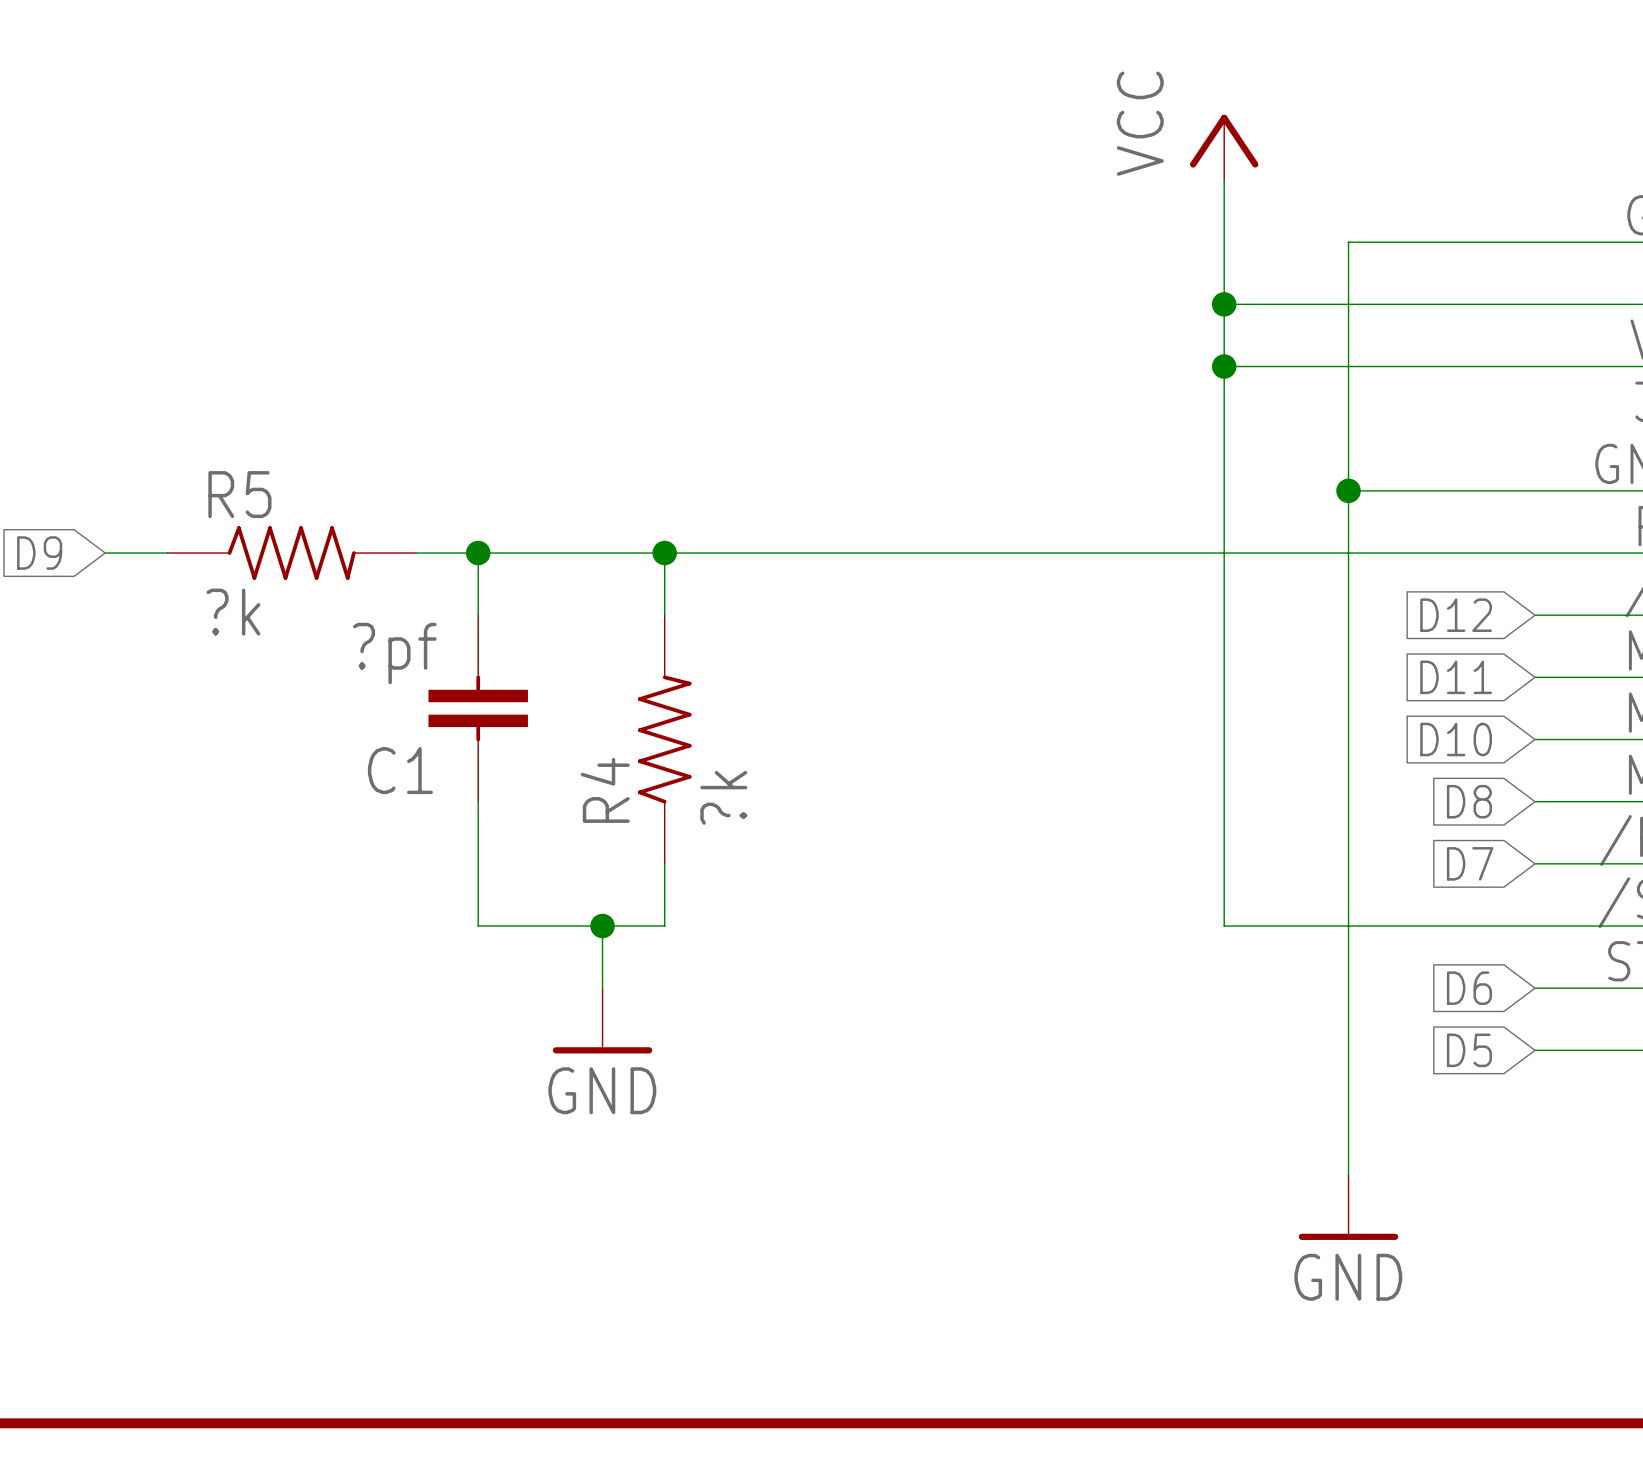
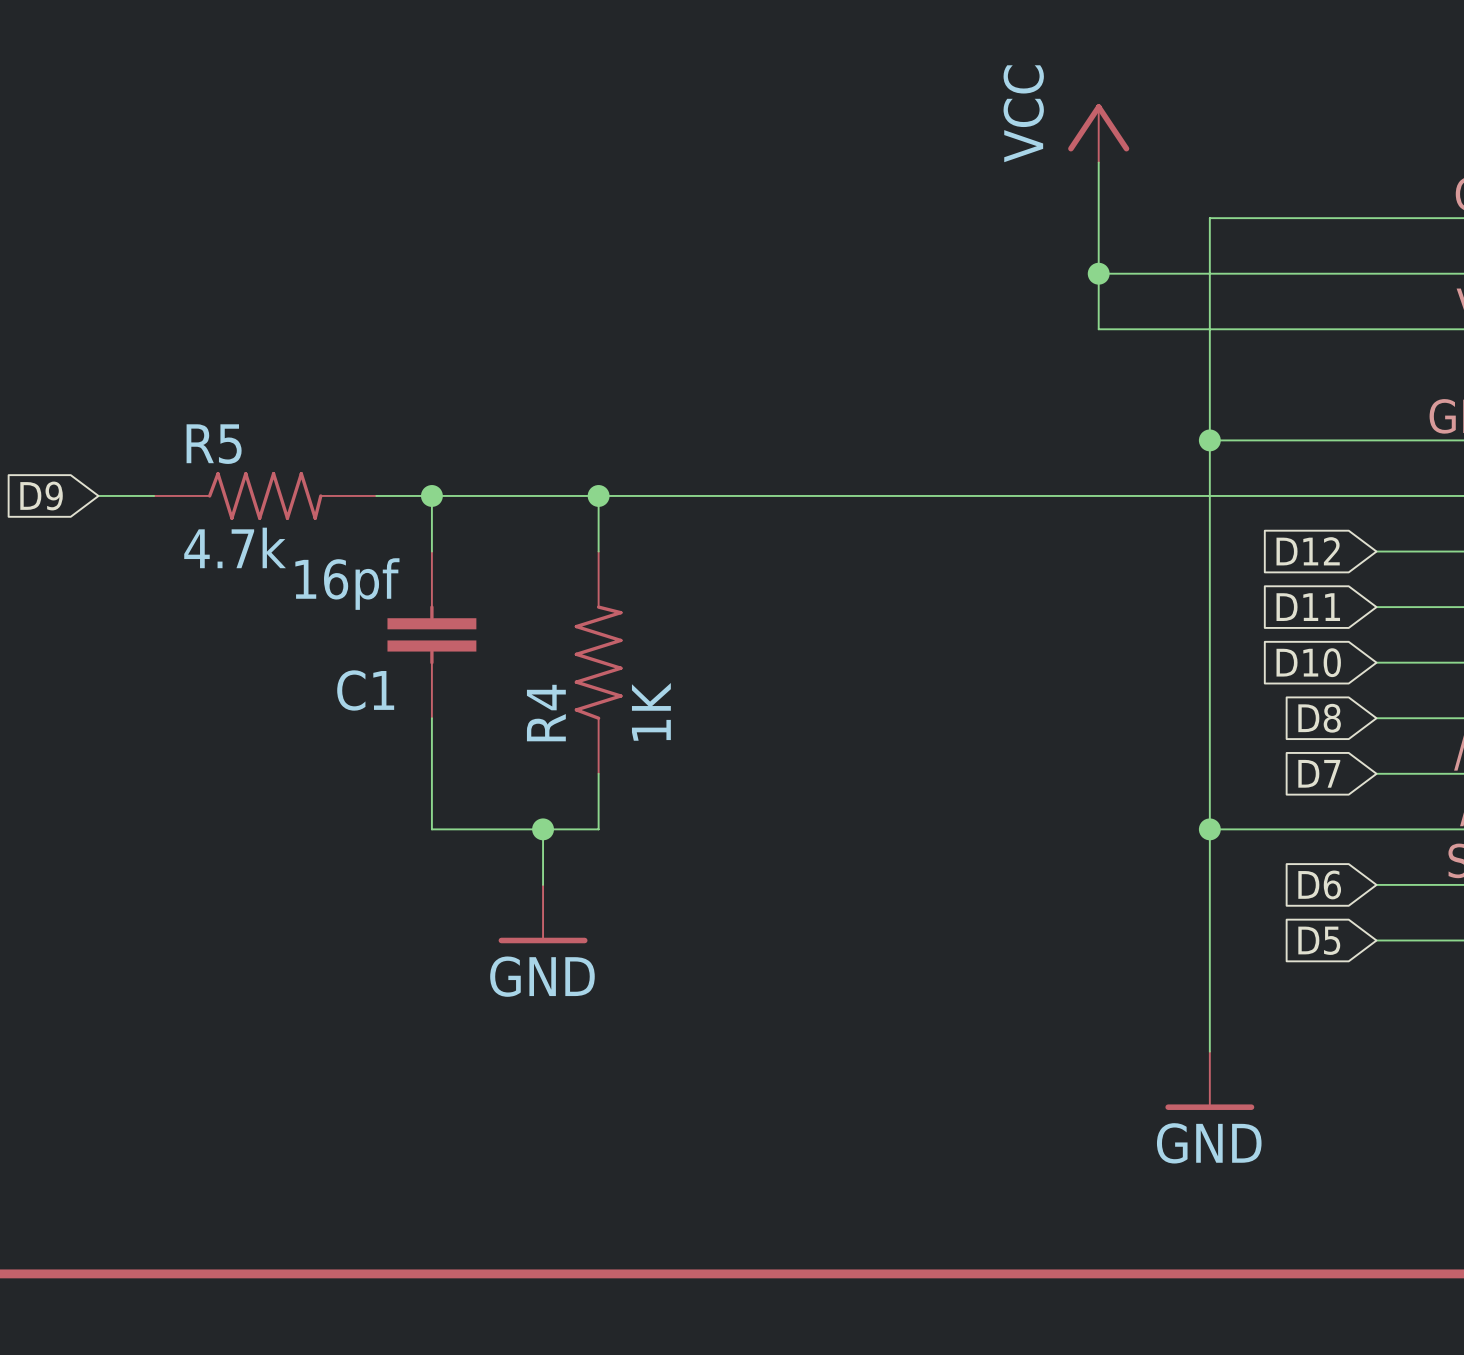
wire: (1224, 366) (1224, 926) (1348, 926) -> none
junction: (1224, 366) -> none
R5 value: ?k (233, 612) -> 4.7k (235, 547)
C1 value: ?pf (394, 653) -> 16pf (347, 584)
R4 value: ?k (723, 797) -> 1K (651, 711)
junction: none -> (1209, 829)

